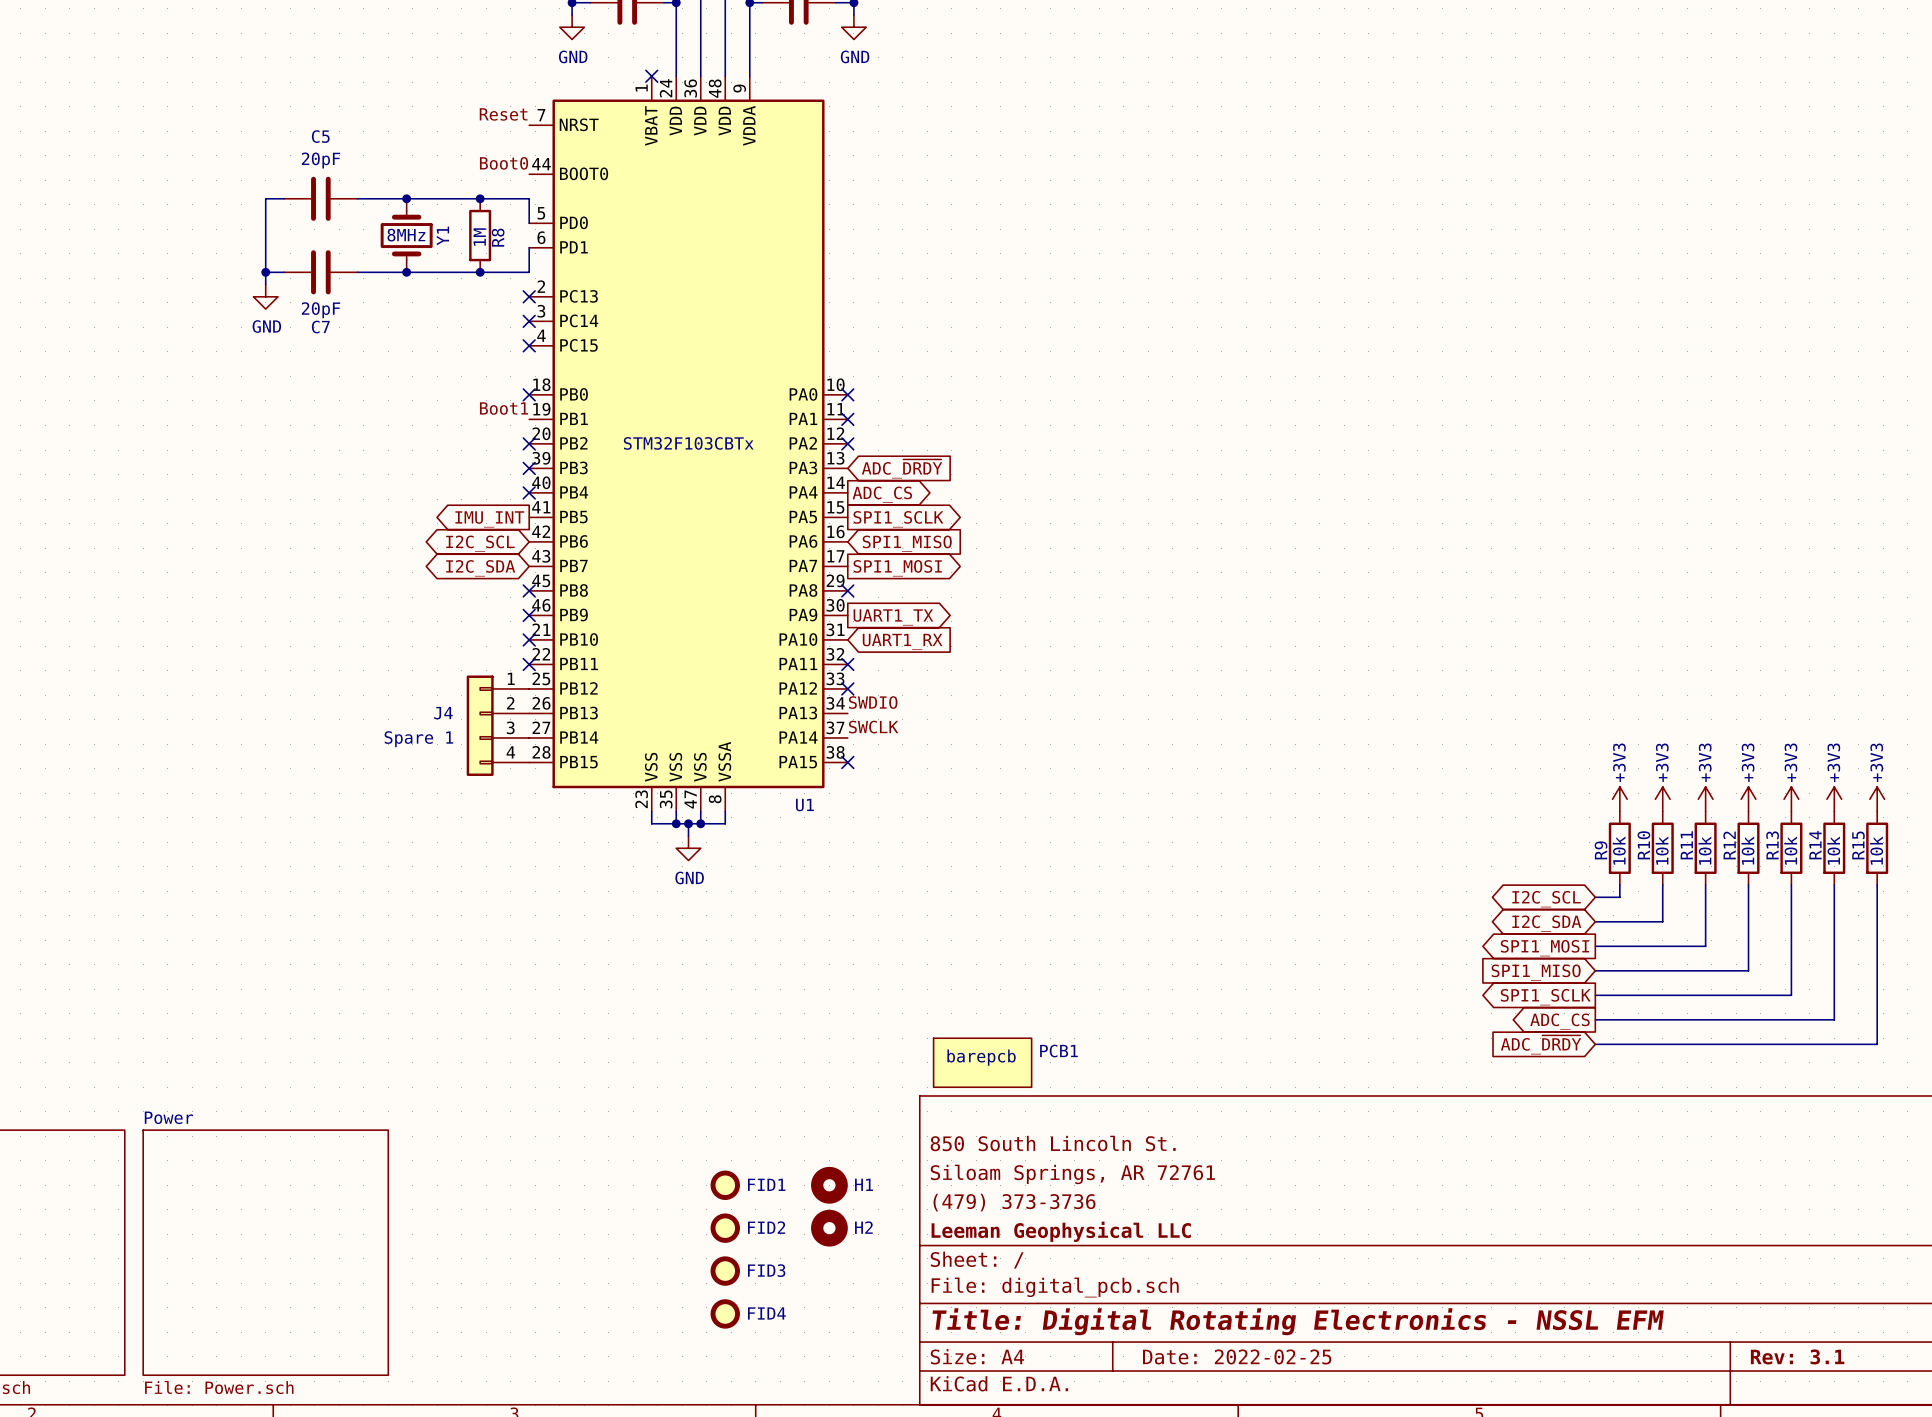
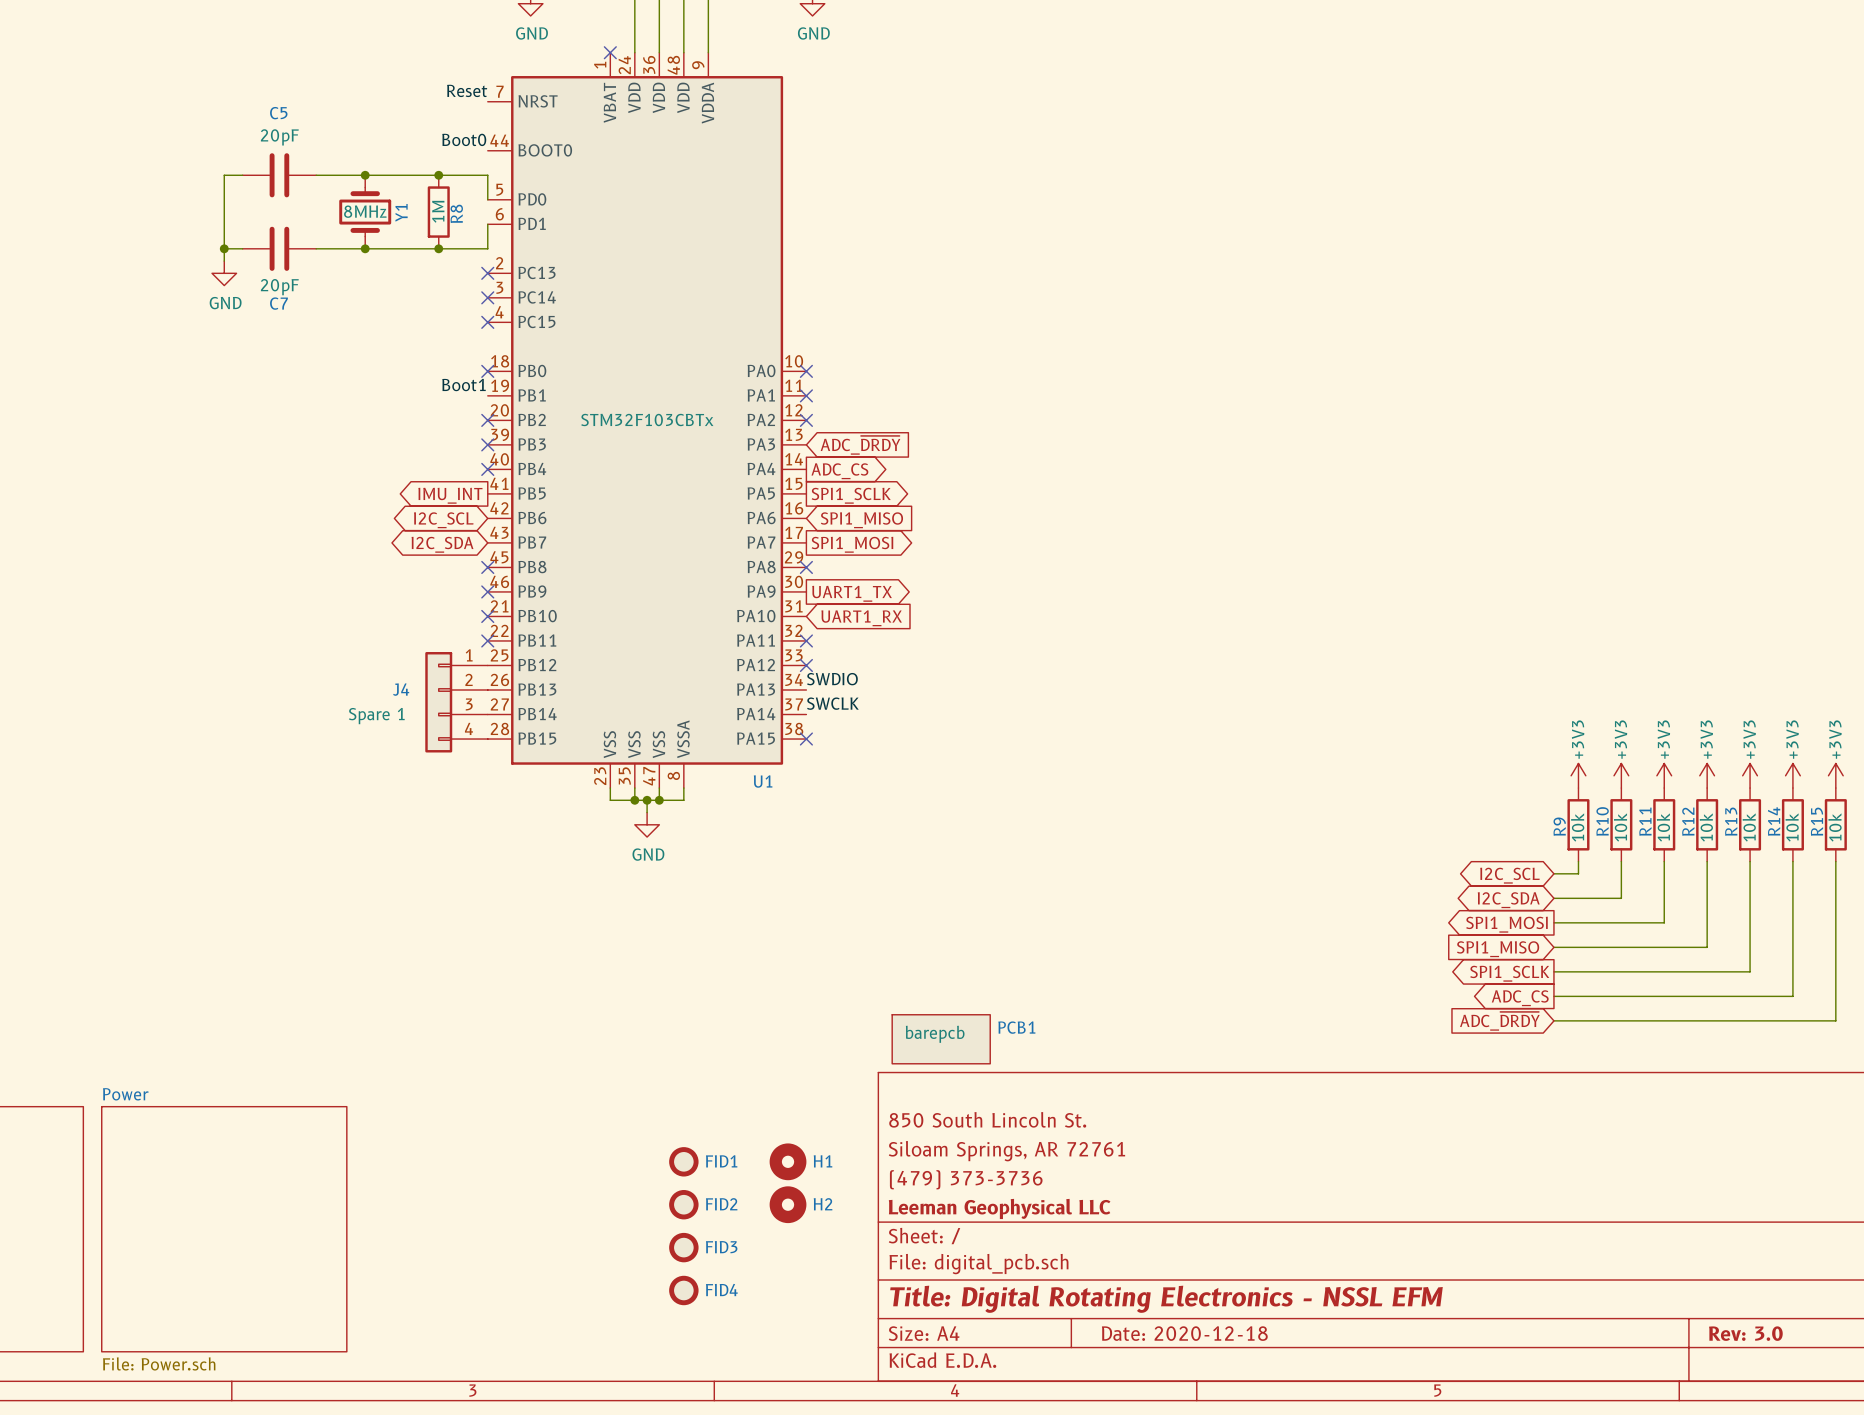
title block: Date: 2022-02-25 (1237, 1356) -> Date: 2020-12-18 (1184, 1333)
title block: Rev: 3.1 (1797, 1356) -> Rev: 3.0 (1745, 1333)

